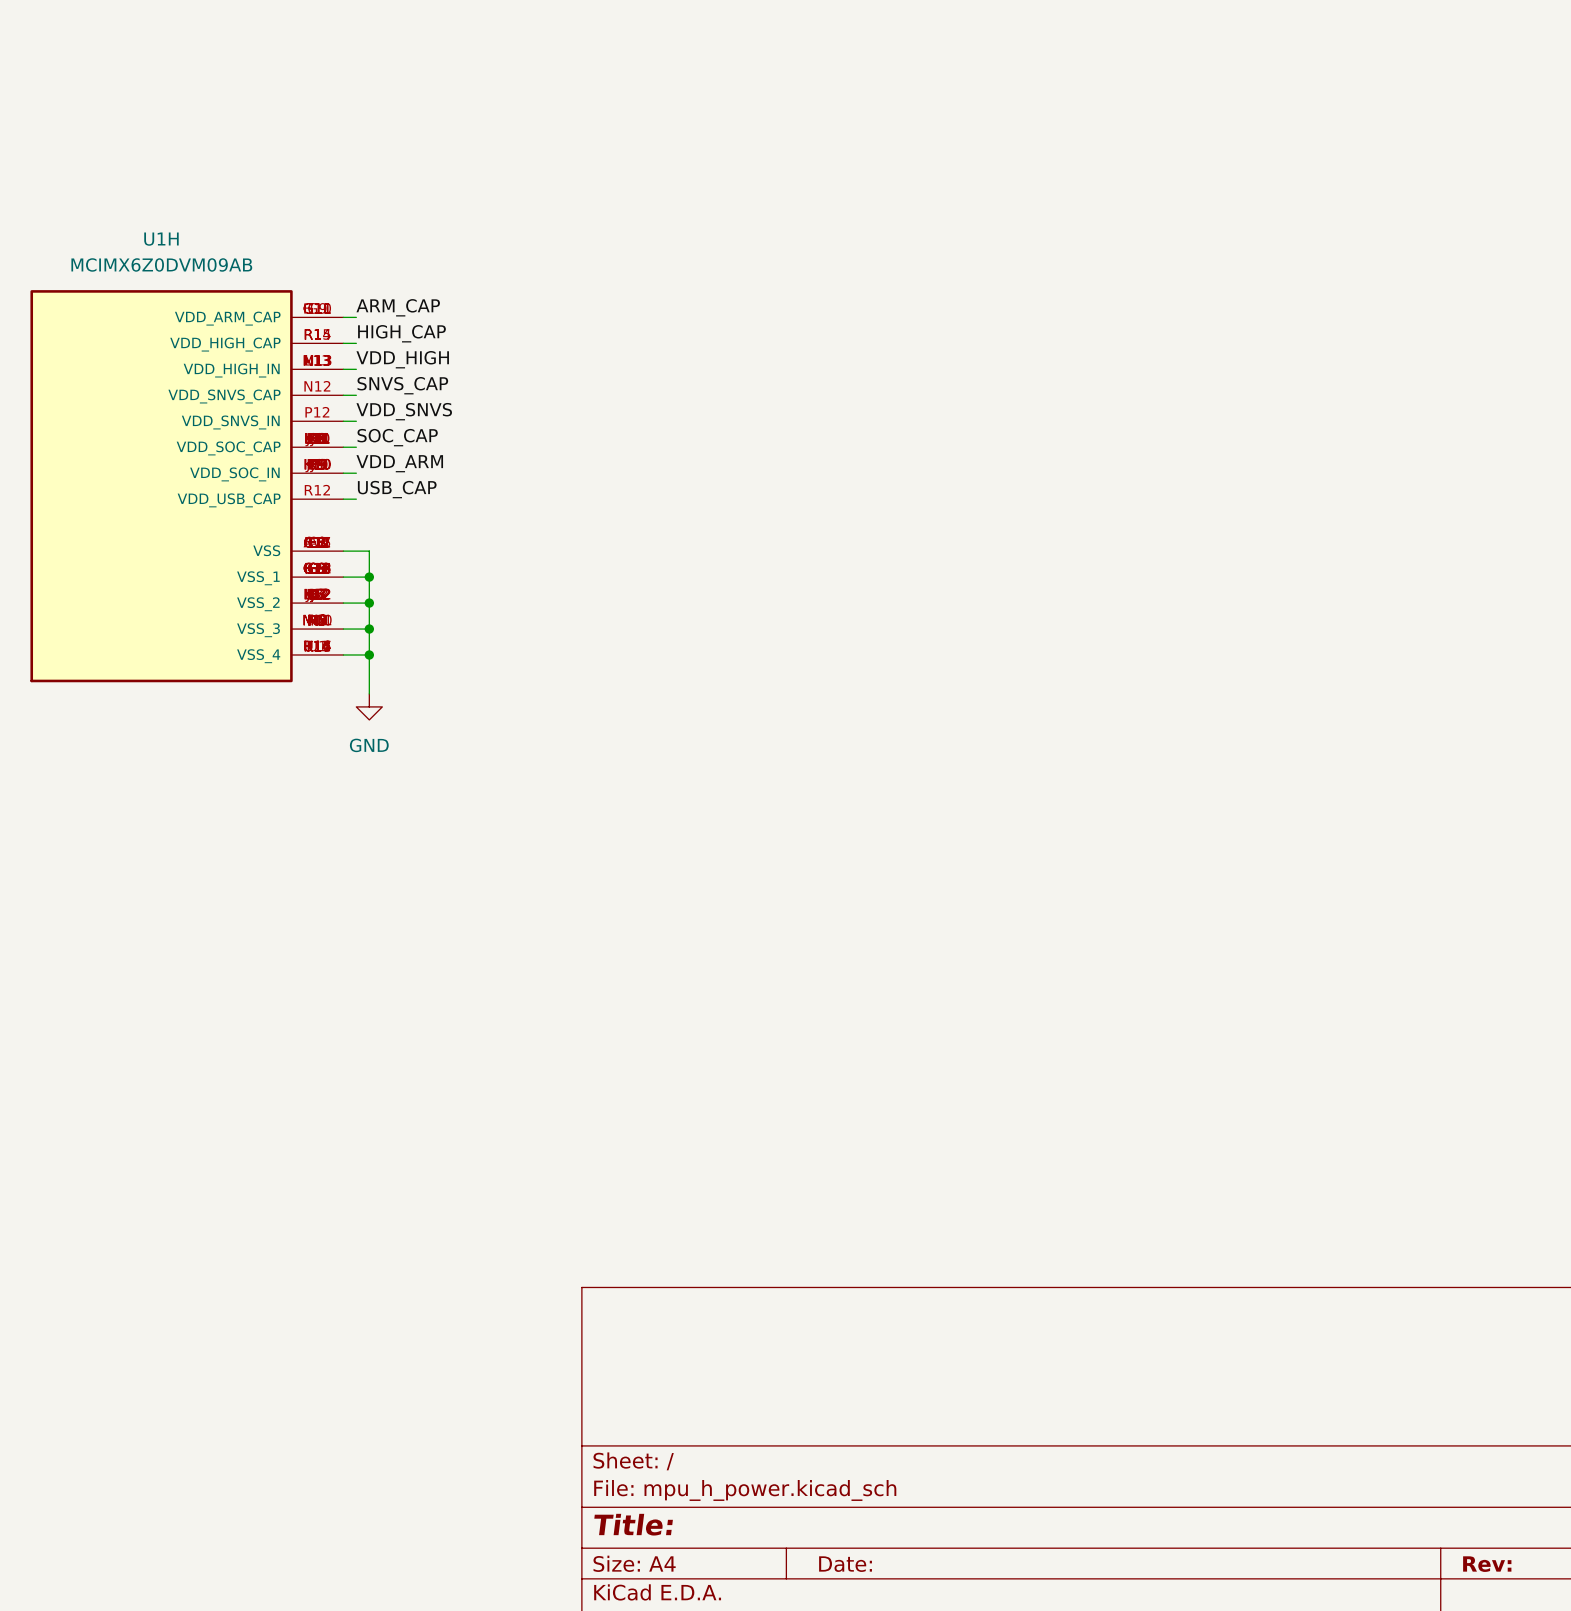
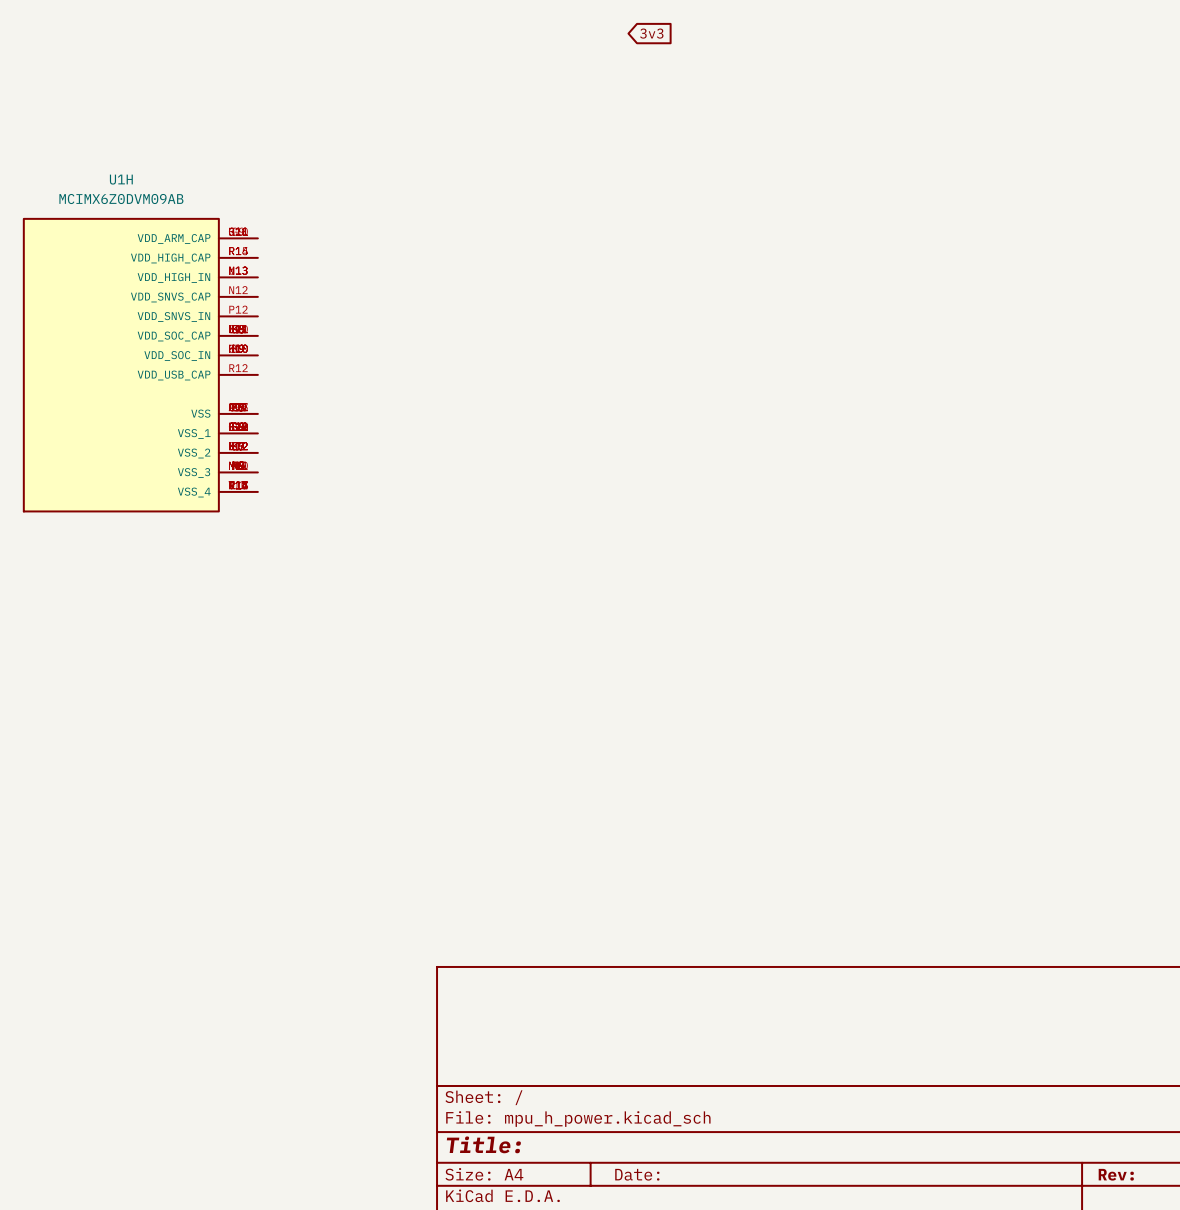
global label: none -> 3v3 (651, 33)
label: ARM_CAP (398, 307) -> none
wire: (343, 317) (356, 317) -> none
label: HIGH_CAP (401, 333) -> none
wire: (343, 343) (356, 343) -> none
label: VDD_HIGH (402, 359) -> none
wire: (343, 369) (356, 369) -> none
label: SNVS_CAP (402, 385) -> none
wire: (343, 395) (356, 395) -> none
label: VDD_SNVS (404, 411) -> none
wire: (343, 421) (356, 421) -> none
label: SOC_CAP (397, 437) -> none
wire: (343, 447) (356, 447) -> none
label: VDD_ARM (399, 463) -> none
wire: (343, 473) (356, 473) -> none
label: USB_CAP (397, 489) -> none
wire: (343, 499) (356, 499) -> none
wire: (343, 551) (369, 551) (369, 693) -> none
wire: (343, 577) (369, 577) -> none
junction: (369, 577) -> none
wire: (343, 603) (369, 603) -> none
junction: (369, 603) -> none
wire: (343, 629) (369, 629) -> none
junction: (369, 629) -> none
wire: (343, 654) (369, 654) -> none
junction: (369, 654) -> none
power symbol: GND (369, 706) -> none

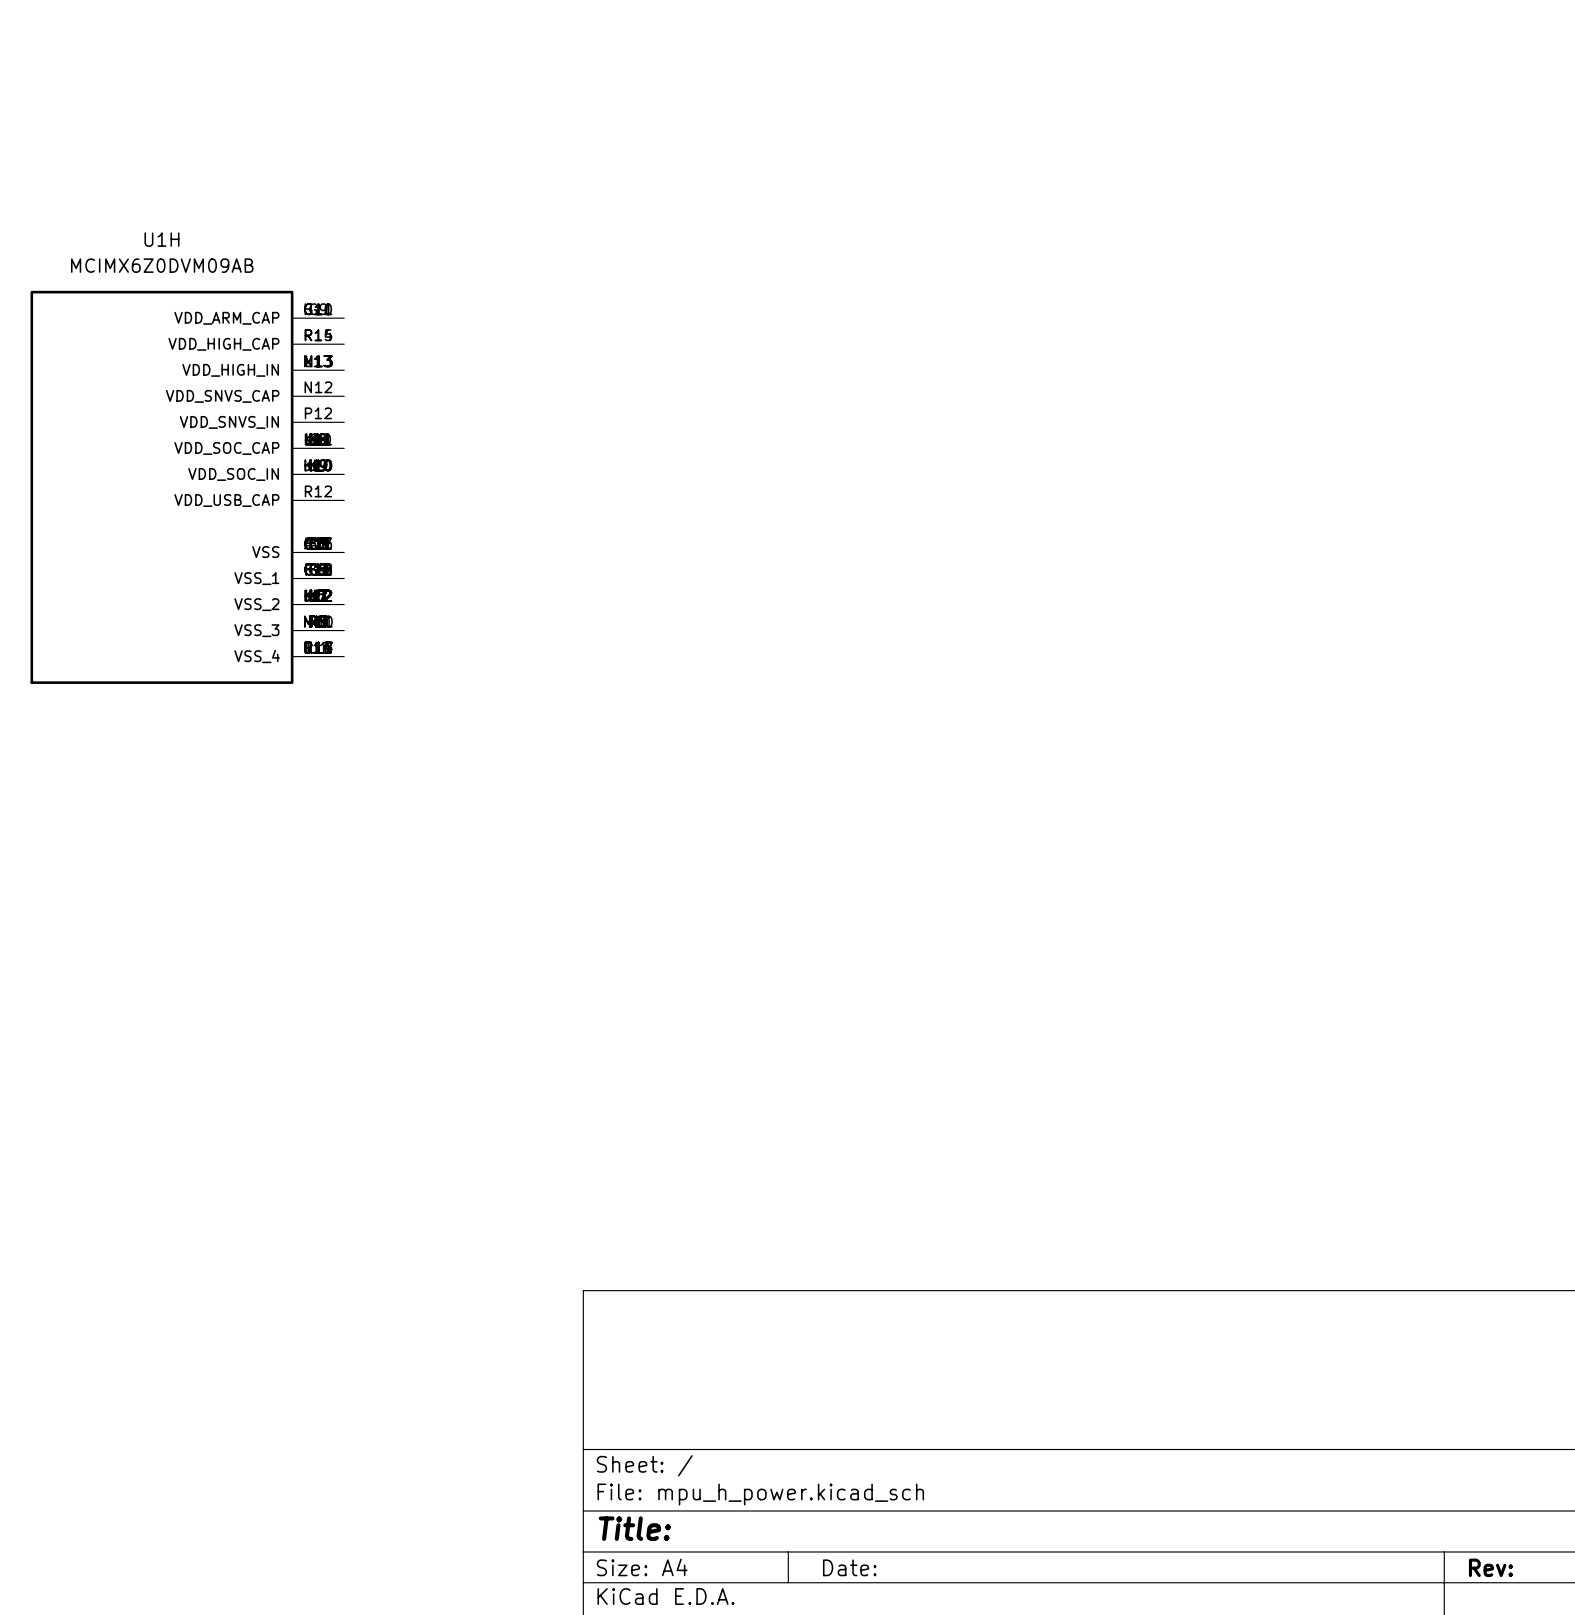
global label: 3v3 (651, 33) -> none

